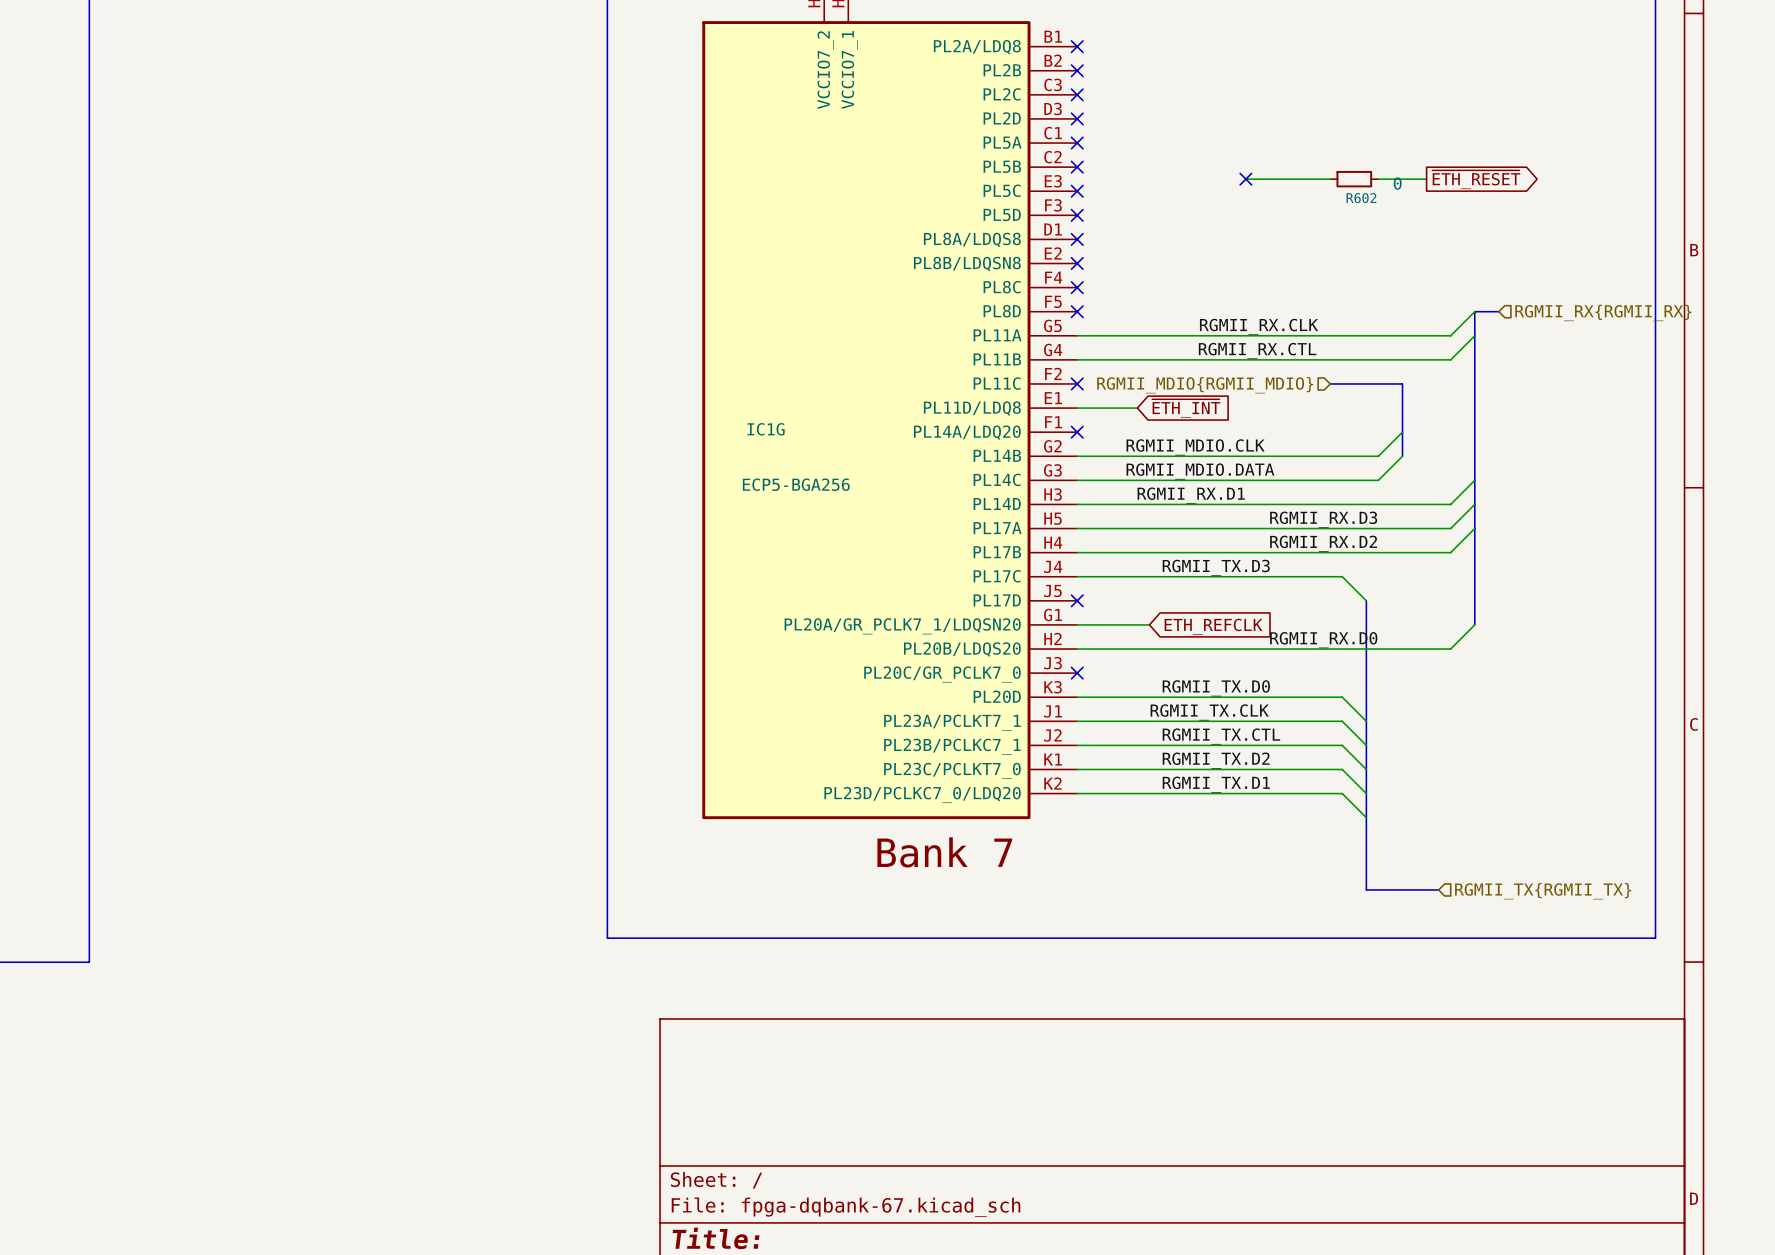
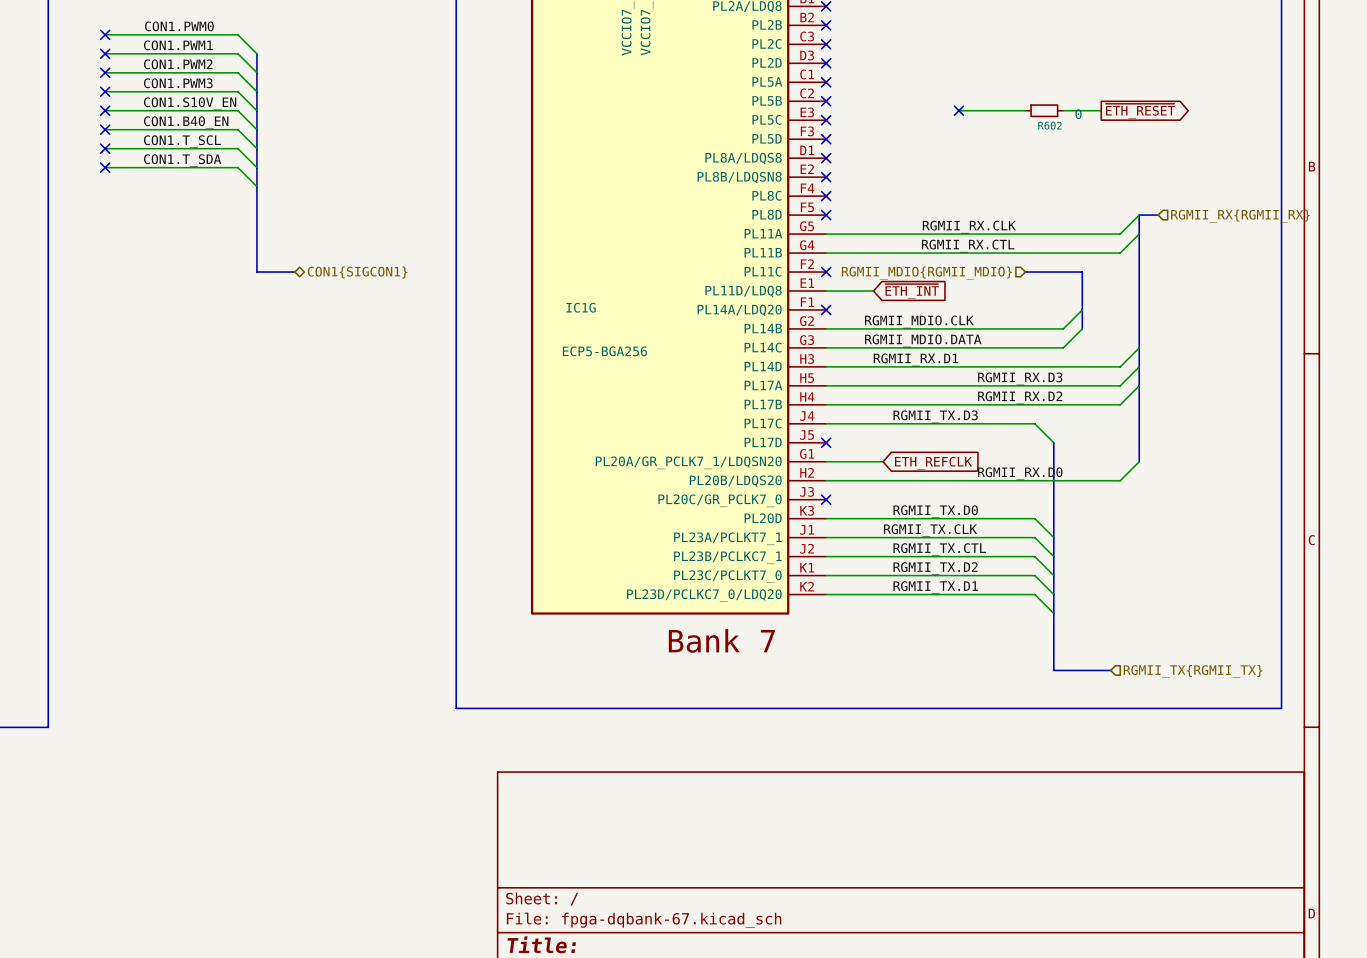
label: none -> CON1.PWM0 (179, 26)
wire: none -> (105, 34) (237, 34) (256, 53)
no-connect mark: none -> (105, 34)
label: none -> CON1.PWM1 (178, 45)
wire: none -> (105, 53) (237, 53) (256, 72)
no-connect mark: none -> (105, 53)
bus: none -> (256, 53) (256, 272) (294, 272)
label: none -> CON1.PWM2 (178, 64)
wire: none -> (105, 72) (237, 72) (256, 91)
no-connect mark: none -> (105, 72)
label: none -> CON1.PWM3 (178, 83)
wire: none -> (105, 91) (237, 91) (256, 110)
no-connect mark: none -> (105, 91)
label: none -> CON1.S10V_EN (190, 103)
wire: none -> (105, 110) (237, 110) (256, 129)
no-connect mark: none -> (105, 110)
label: none -> CON1.B40_EN (186, 122)
wire: none -> (105, 129) (237, 129) (256, 148)
no-connect mark: none -> (105, 129)
label: none -> CON1.T_SCL (182, 141)
wire: none -> (105, 148) (237, 148) (256, 167)
no-connect mark: none -> (105, 148)
label: none -> CON1.T_SDA (182, 160)
wire: none -> (105, 167) (237, 167) (256, 186)
no-connect mark: none -> (105, 167)
hierarchical label: none -> CON1{SIGCON1} (357, 272)

